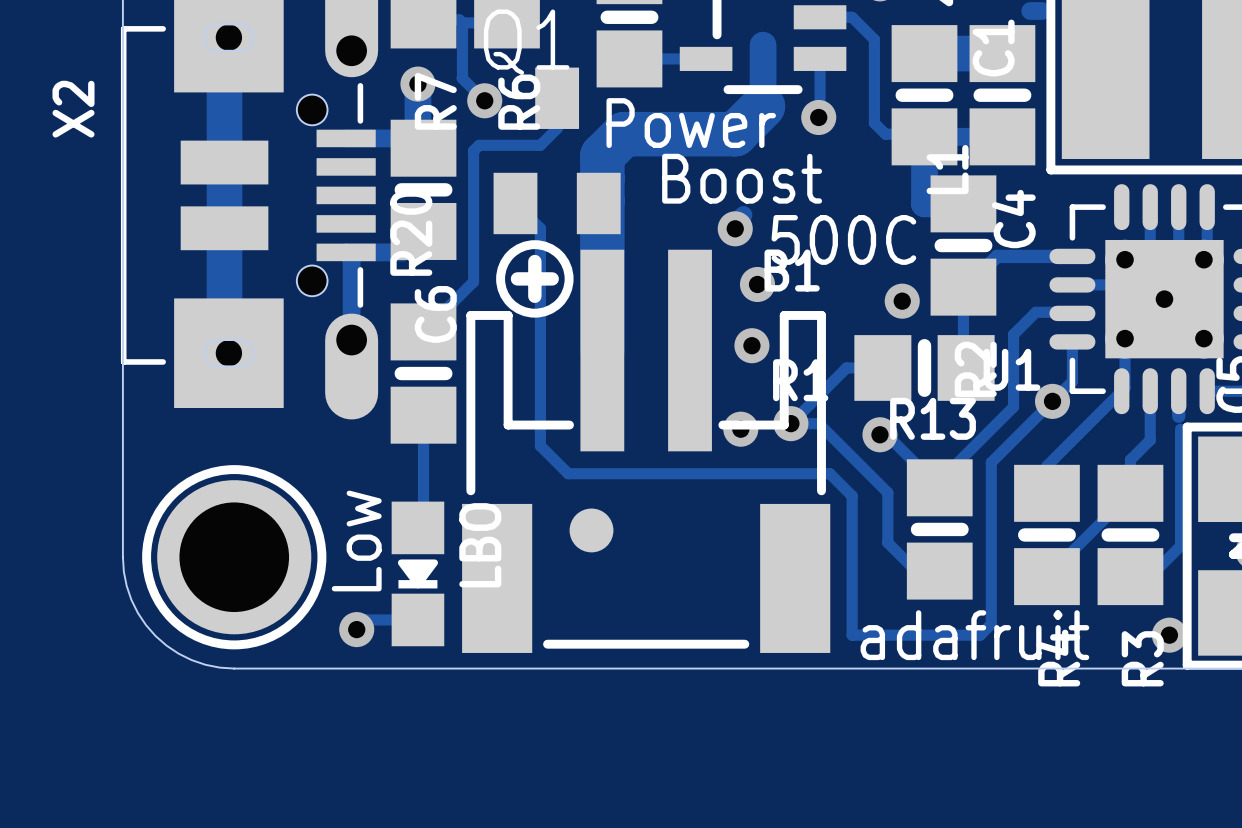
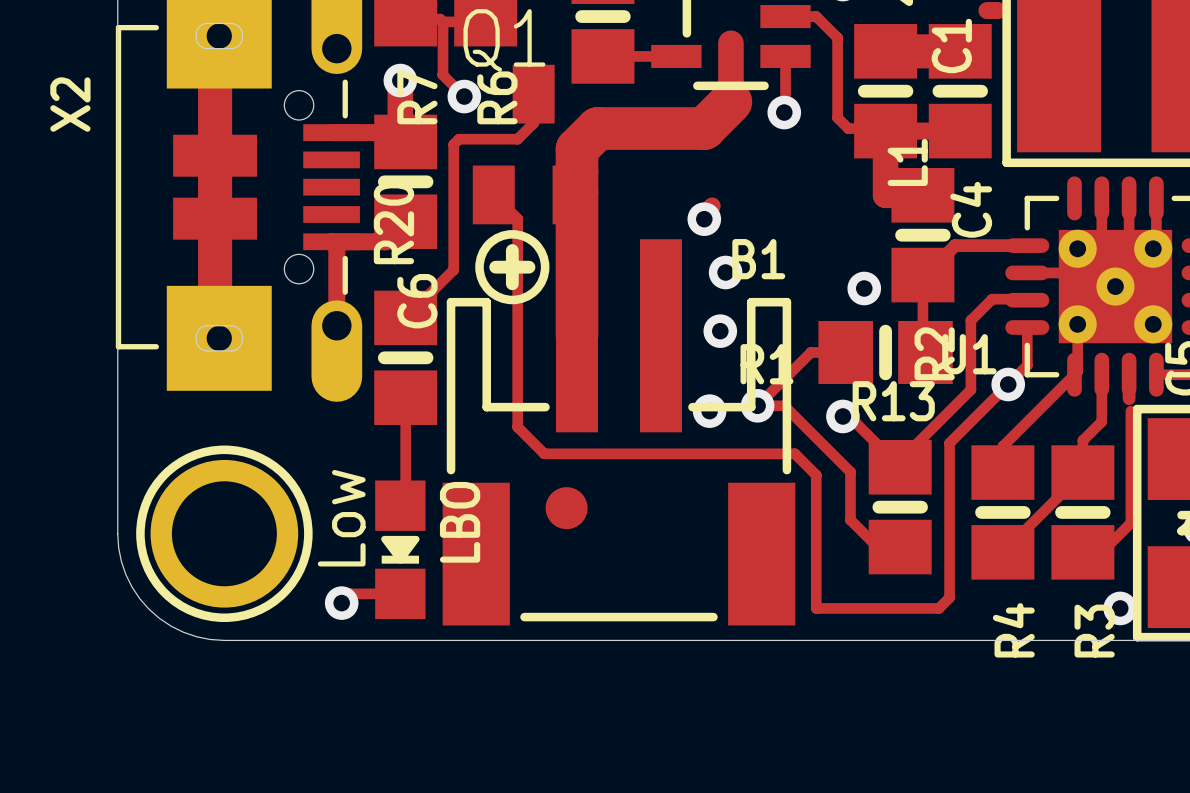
text: Power (691, 123) -> none
text: Boost (742, 178) -> none
text: 500C (843, 239) -> none
text: adafruit (974, 635) -> none

